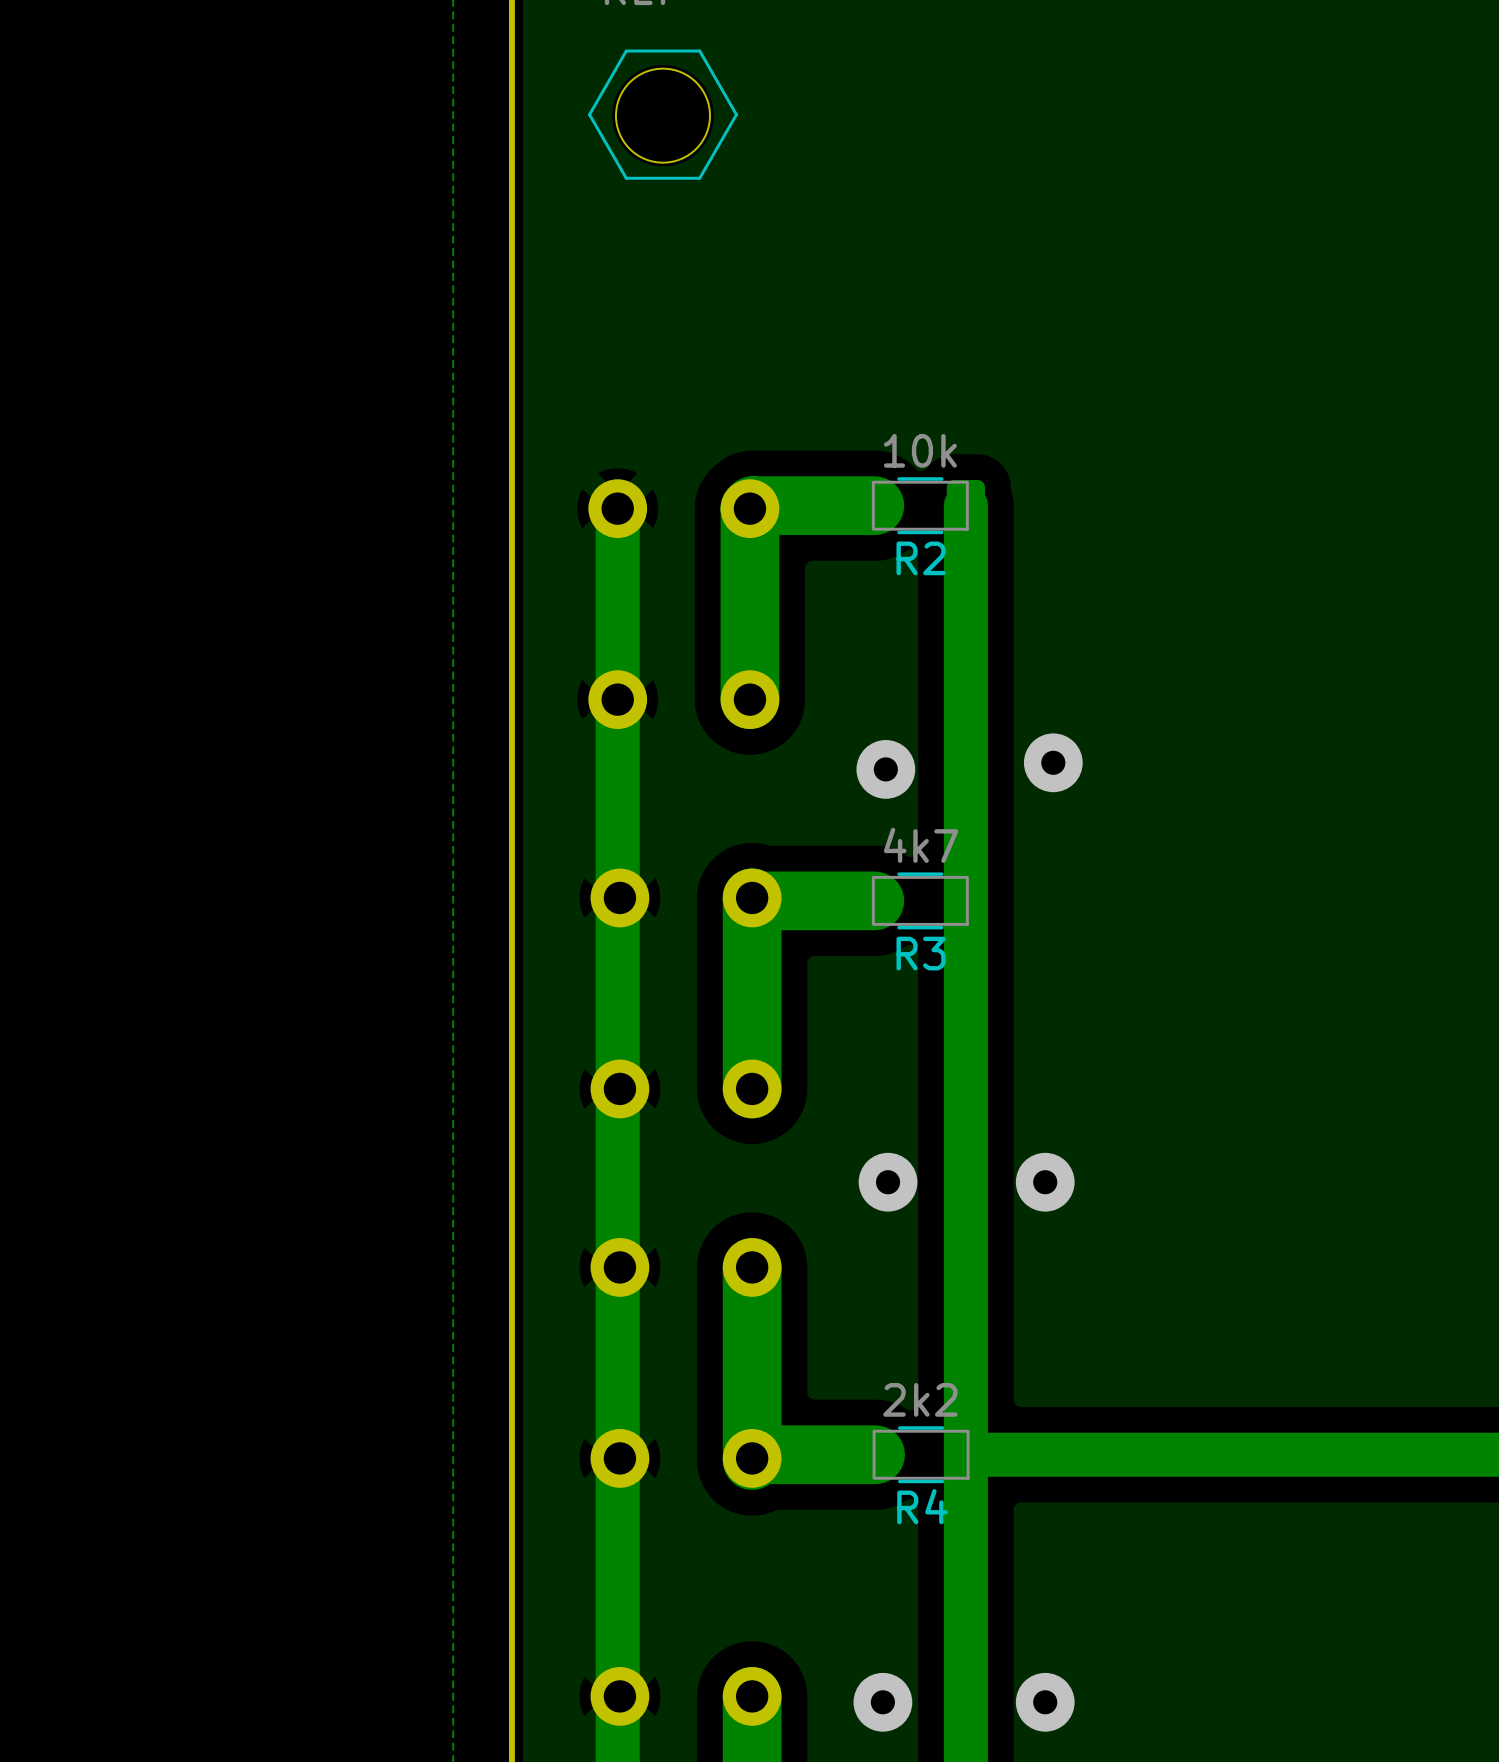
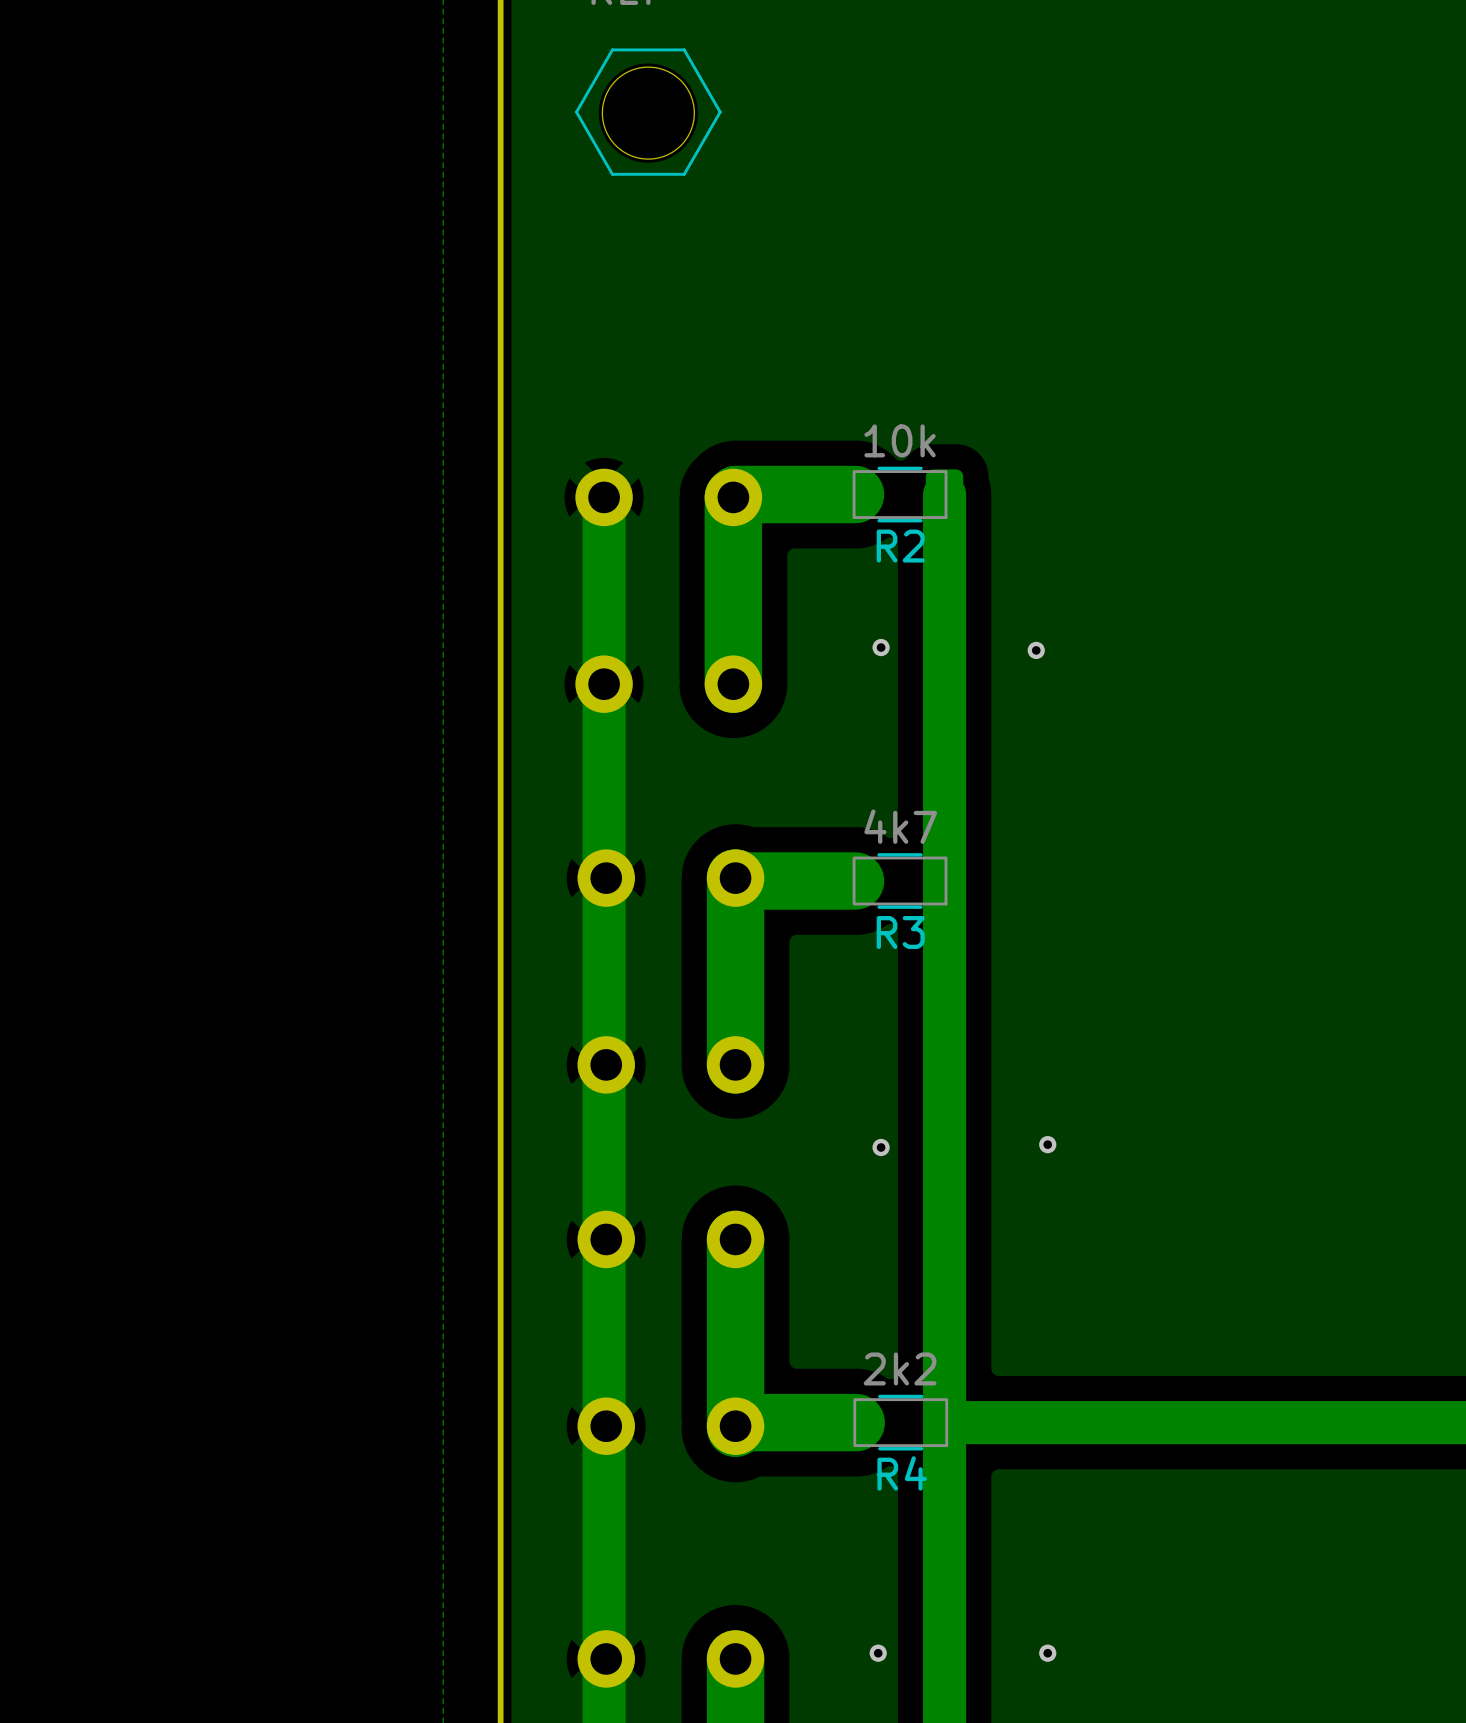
via: none -> (881, 647)
via: none -> (1036, 650)
via: (1053, 762) -> none
via: (885, 769) -> none
via size: [858, 1152, 918, 1212] -> [872, 1138, 890, 1157]
via size: [1015, 1152, 1075, 1212] -> [1039, 1136, 1057, 1154]
via size: [853, 1672, 913, 1732] -> [869, 1644, 887, 1662]
via size: [1015, 1672, 1075, 1732] -> [1039, 1644, 1057, 1662]

